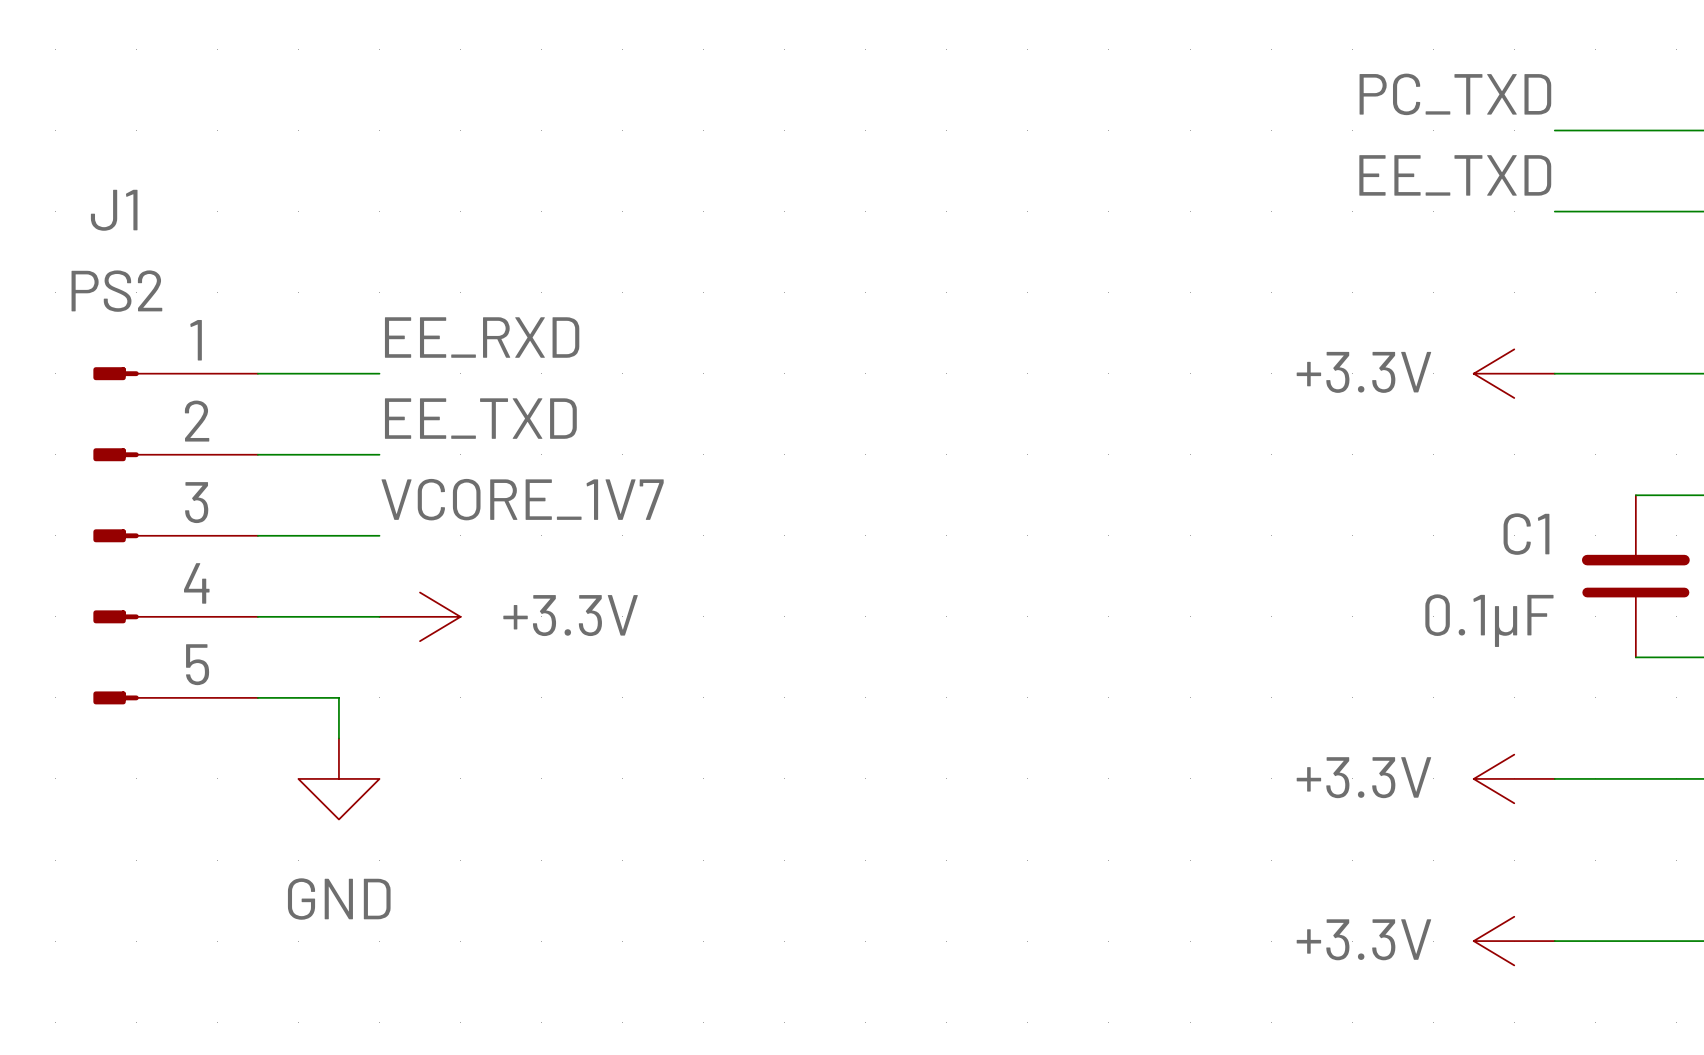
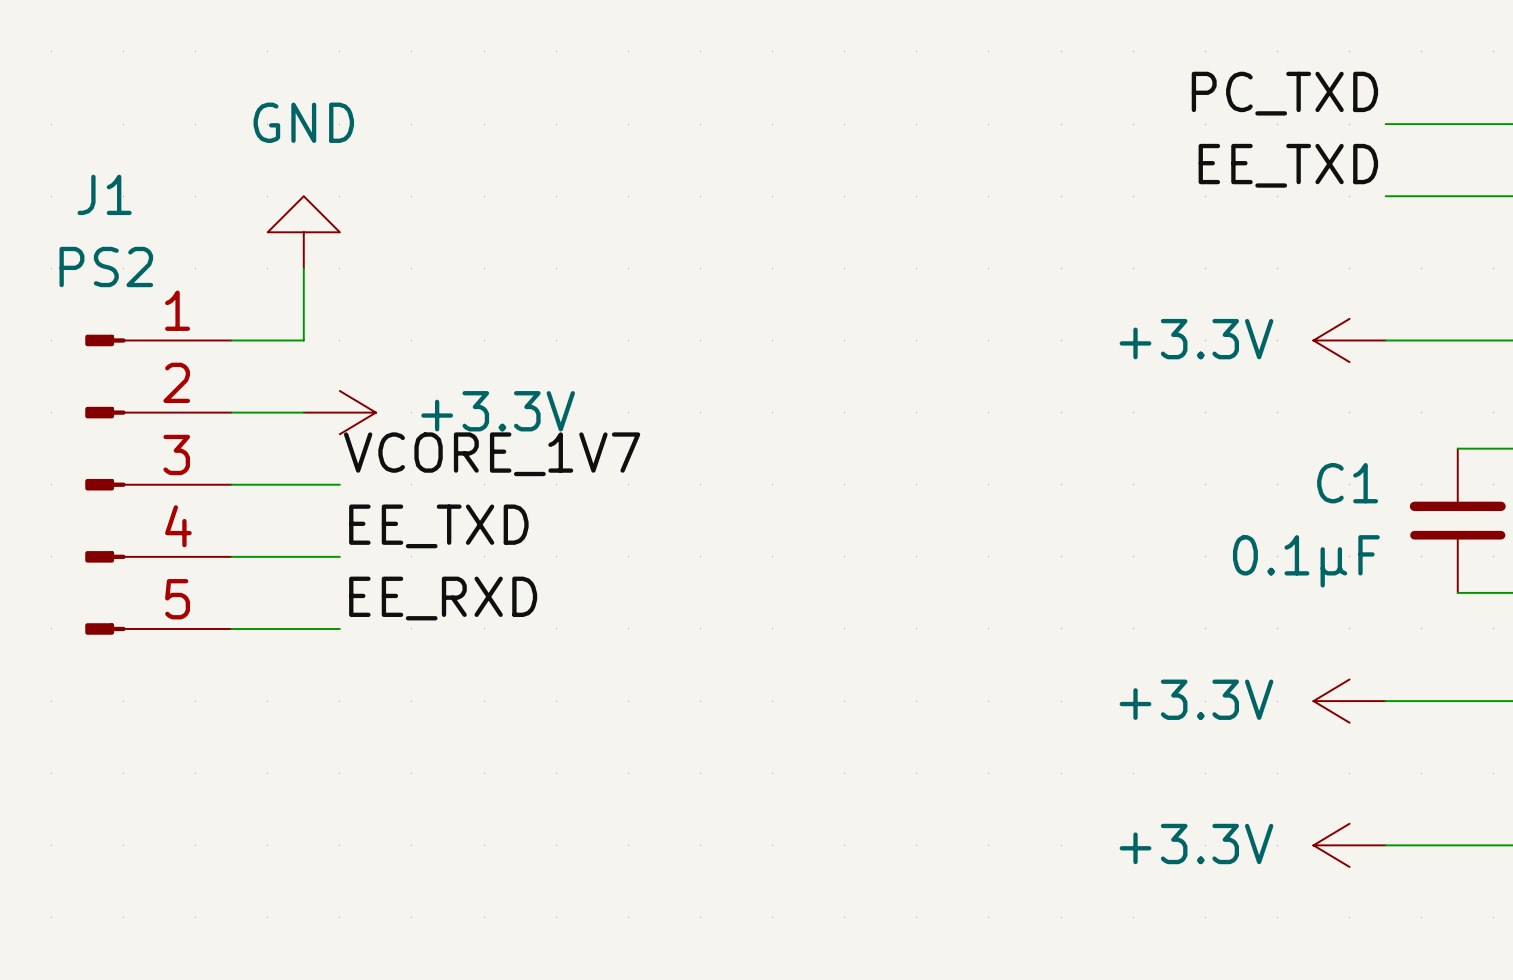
label position: EE_RXD (482, 337) -> EE_RXD (443, 598)
wire: (338, 373) (379, 373) -> (303, 340) (303, 268)
label position: EE_TXD (480, 418) -> EE_TXD (438, 526)
power symbol position: +3.3V (420, 616) -> +3.3V (339, 412)
wire: (338, 697) (338, 738) -> (303, 628) (339, 628)
power symbol rotation: 0° (338, 778) -> 180° (303, 232)
power symbol position: GND (338, 778) -> GND (303, 232)

